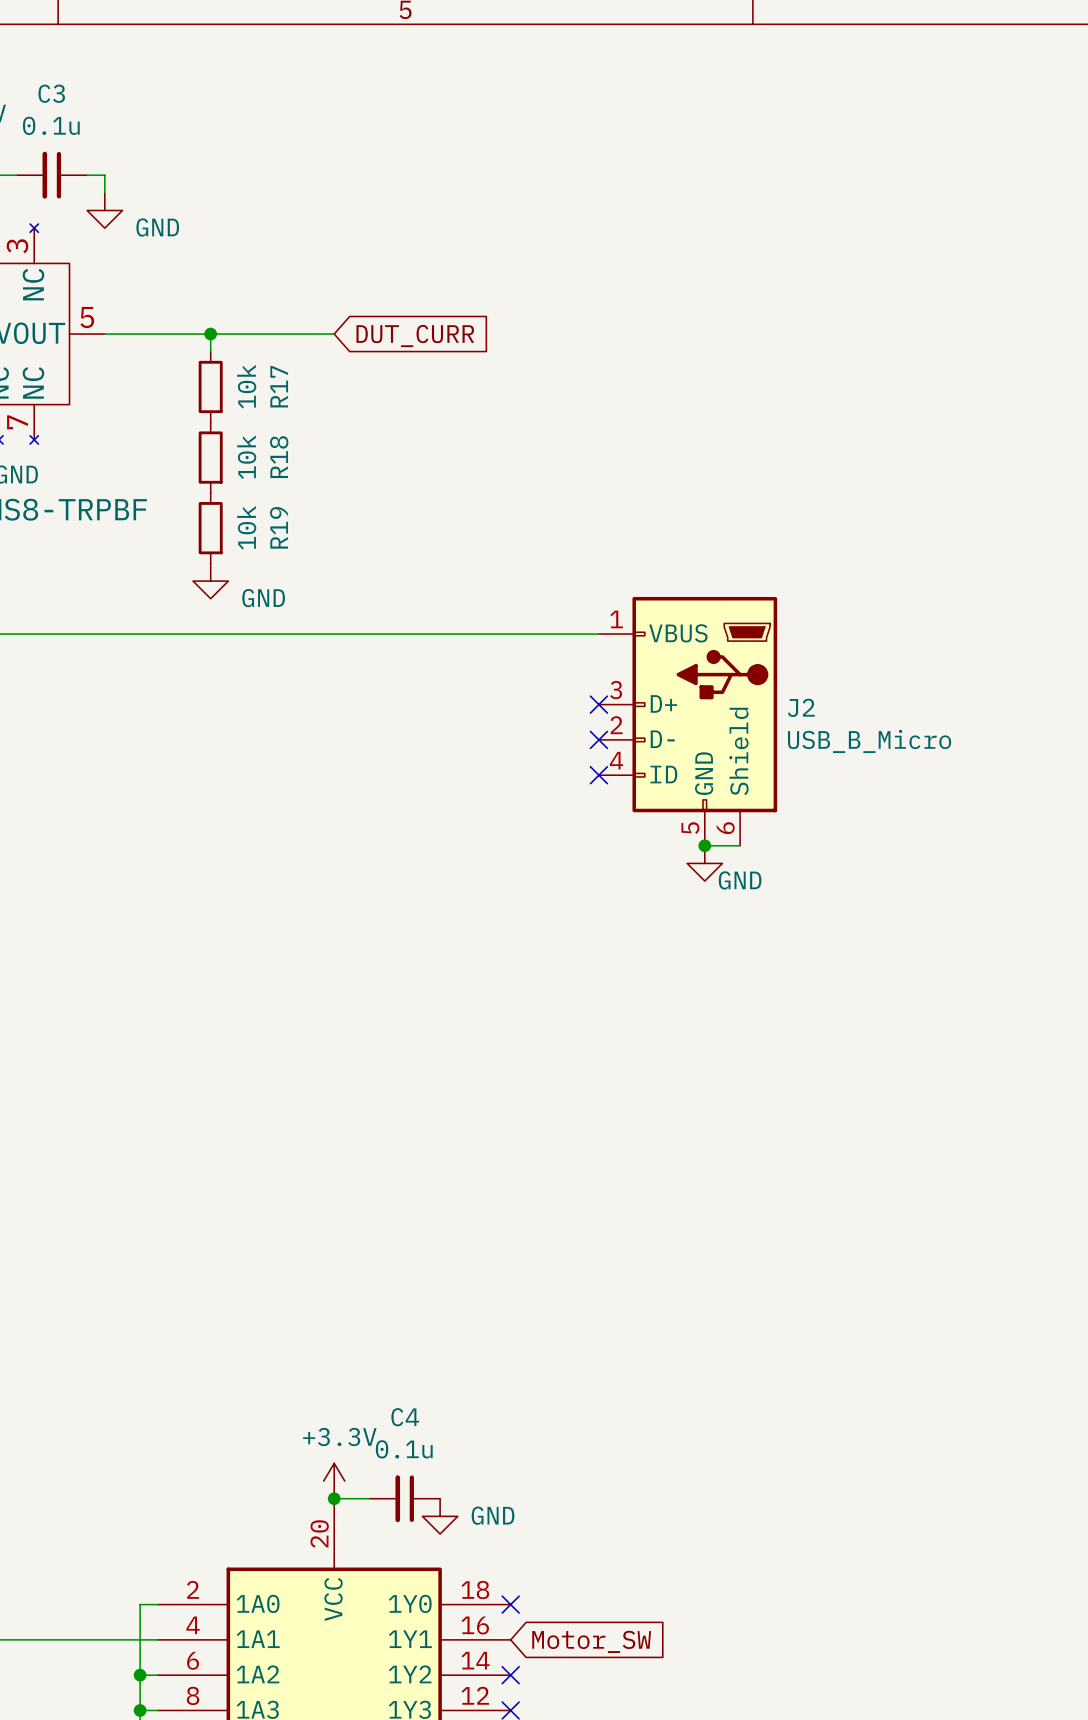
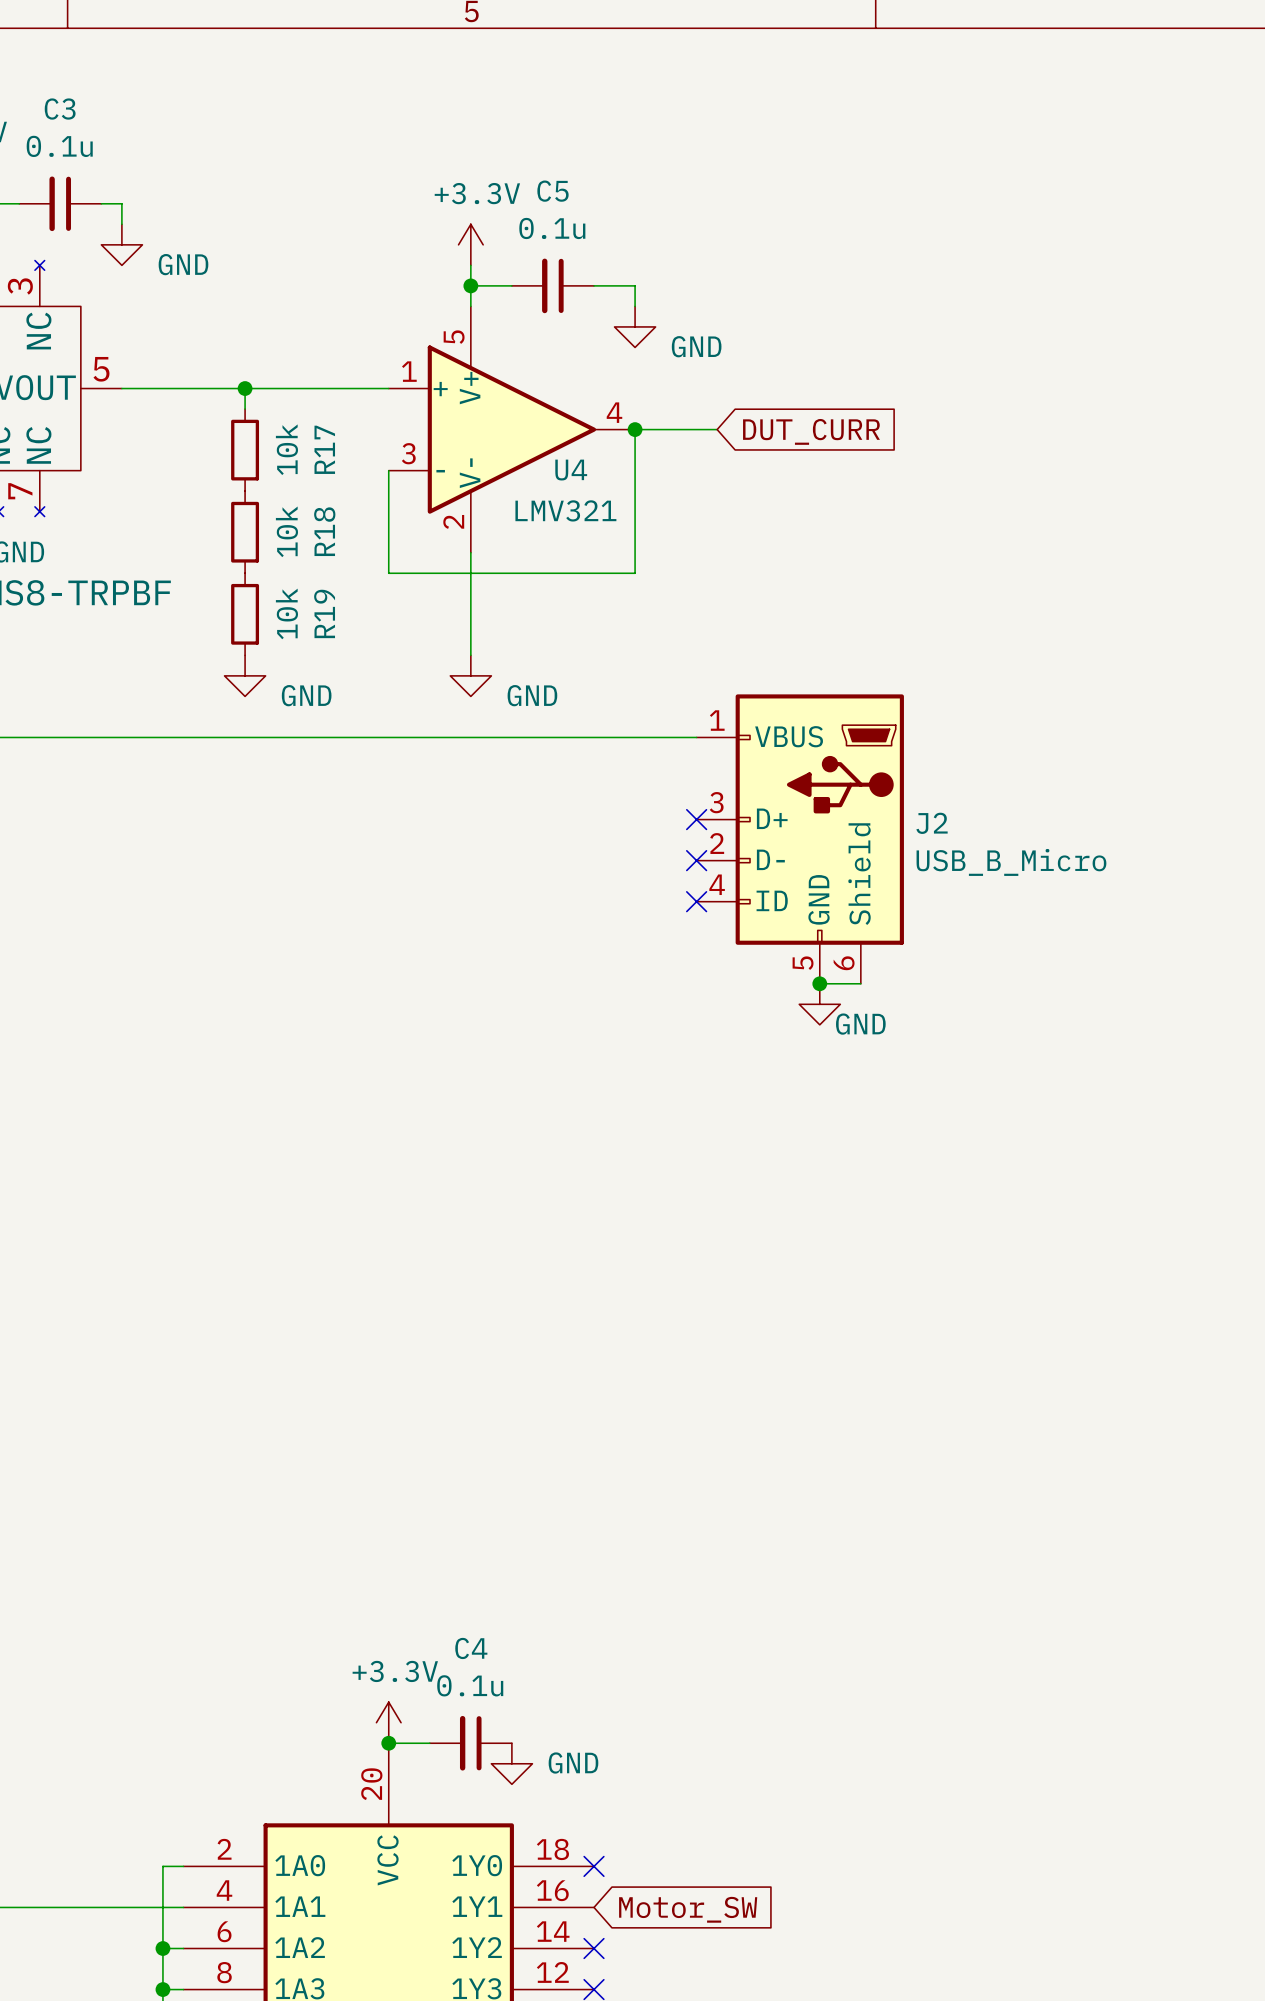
power symbol: none -> +3.3V (470, 244)
wire: none -> (470, 265) (470, 306)
wire: none -> (470, 285) (511, 285)
junction: none -> (470, 285)
C5: none -> 0.1u (552, 285)
wire: none -> (594, 285) (635, 285) (635, 306)
power symbol: none -> GND (635, 326)
global label position: DUT_CURR (415, 336) -> DUT_CURR (811, 431)
U4: none -> LMV321 (511, 429)
junction: none -> (635, 429)
wire: none -> (717, 429) (635, 429) (635, 573) (388, 573) (388, 470)
wire: none -> (470, 552) (470, 655)
power symbol: none -> GND (470, 675)

